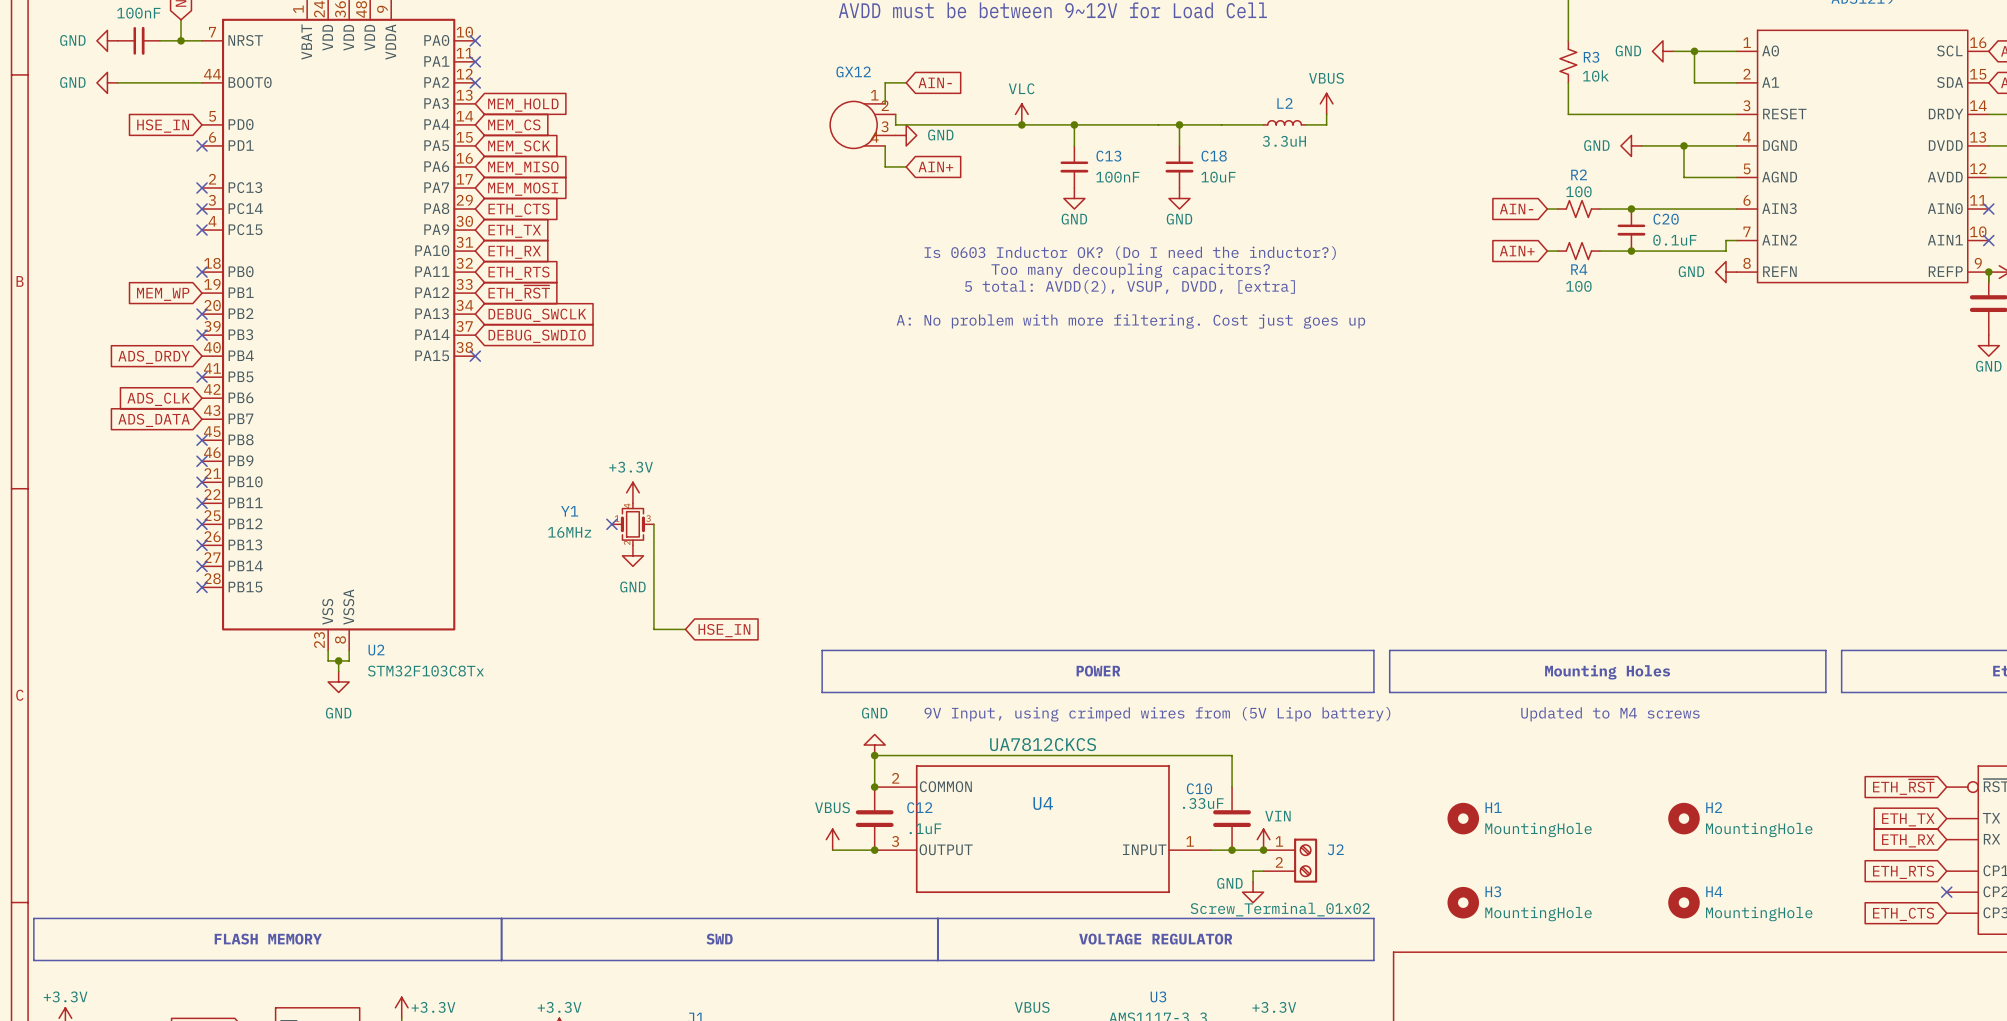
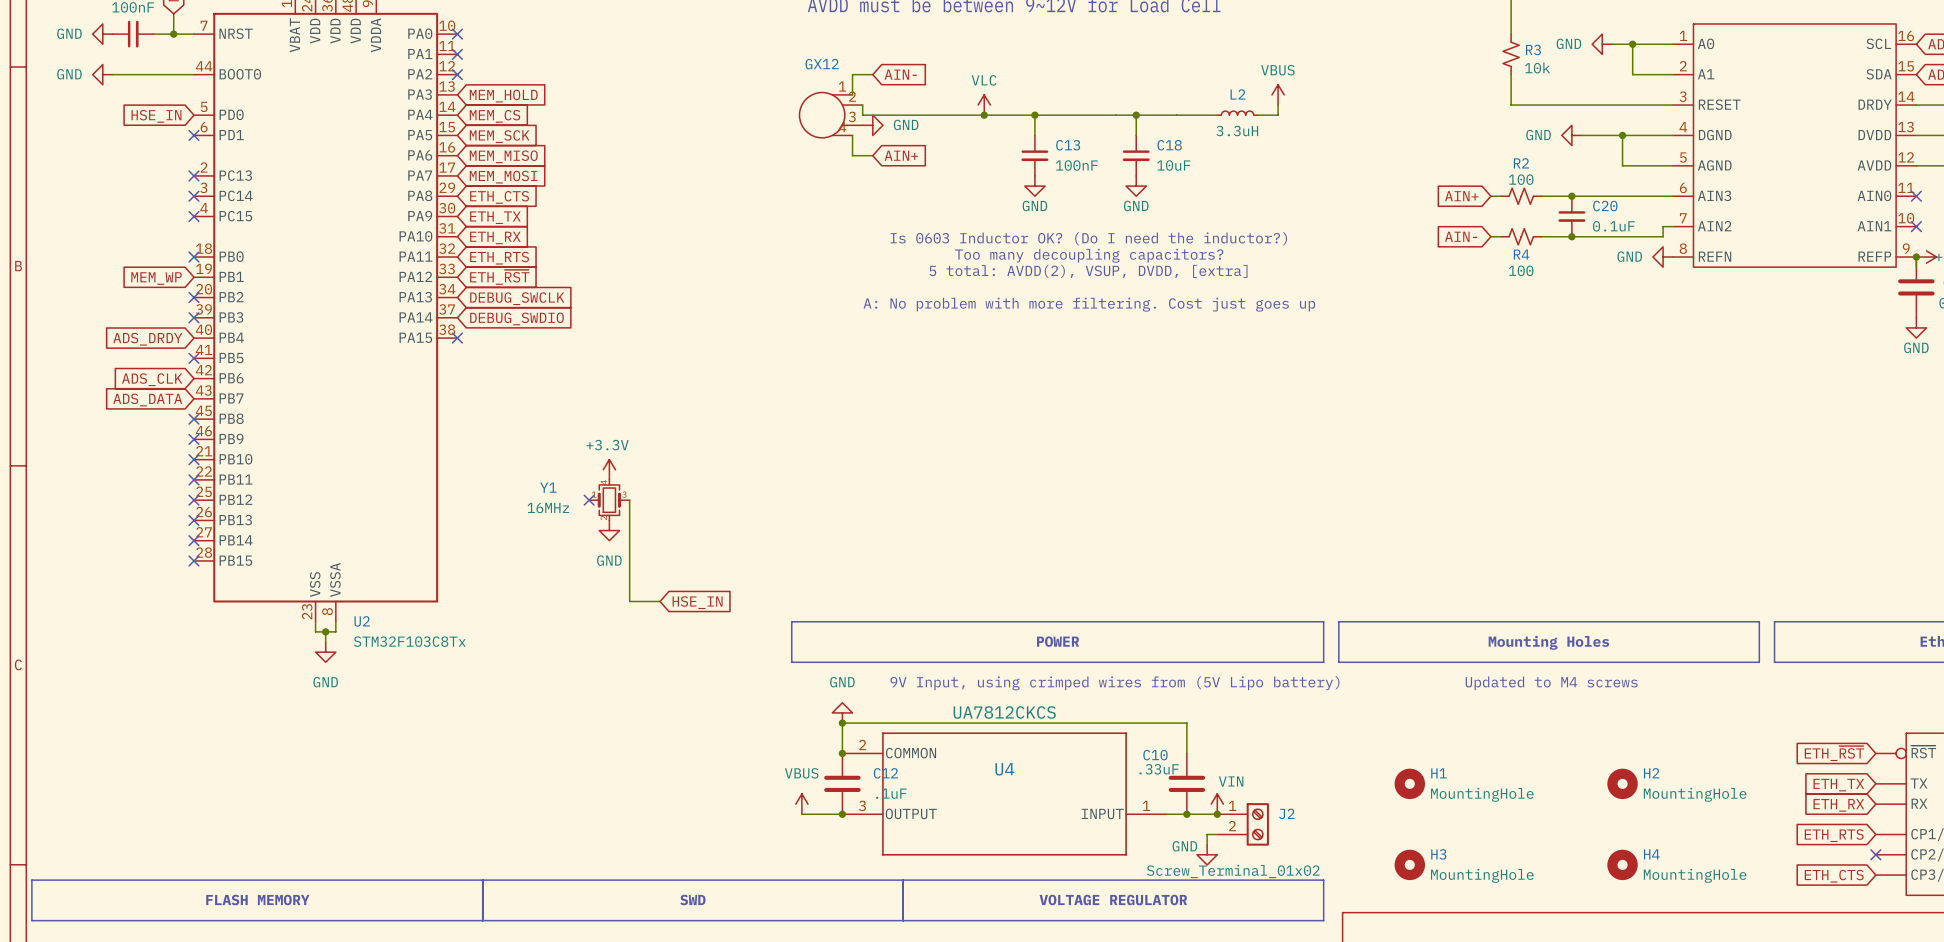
global label: AIN- (1516, 209) -> AIN+ (1461, 196)
global label: AIN+ (1517, 251) -> AIN- (1461, 236)

